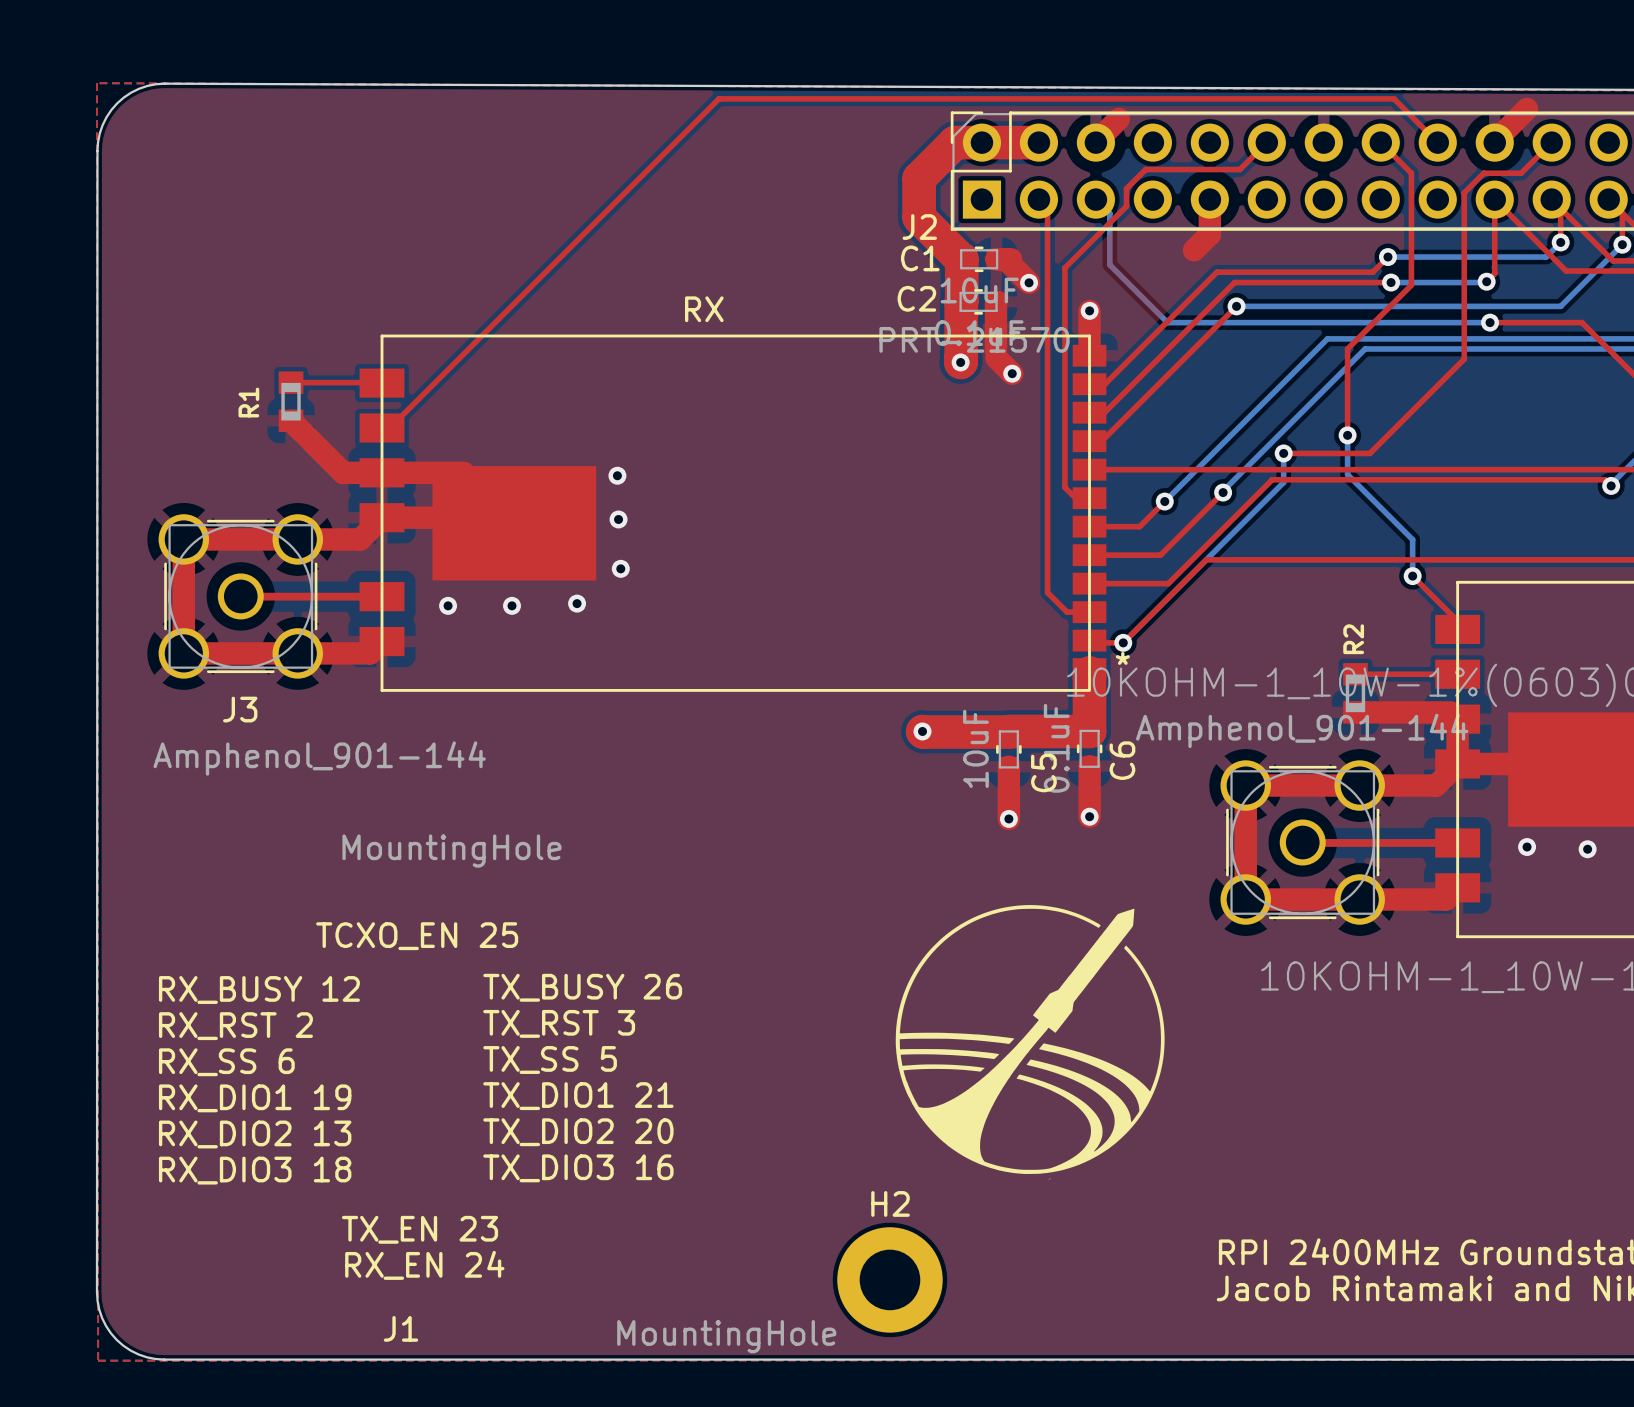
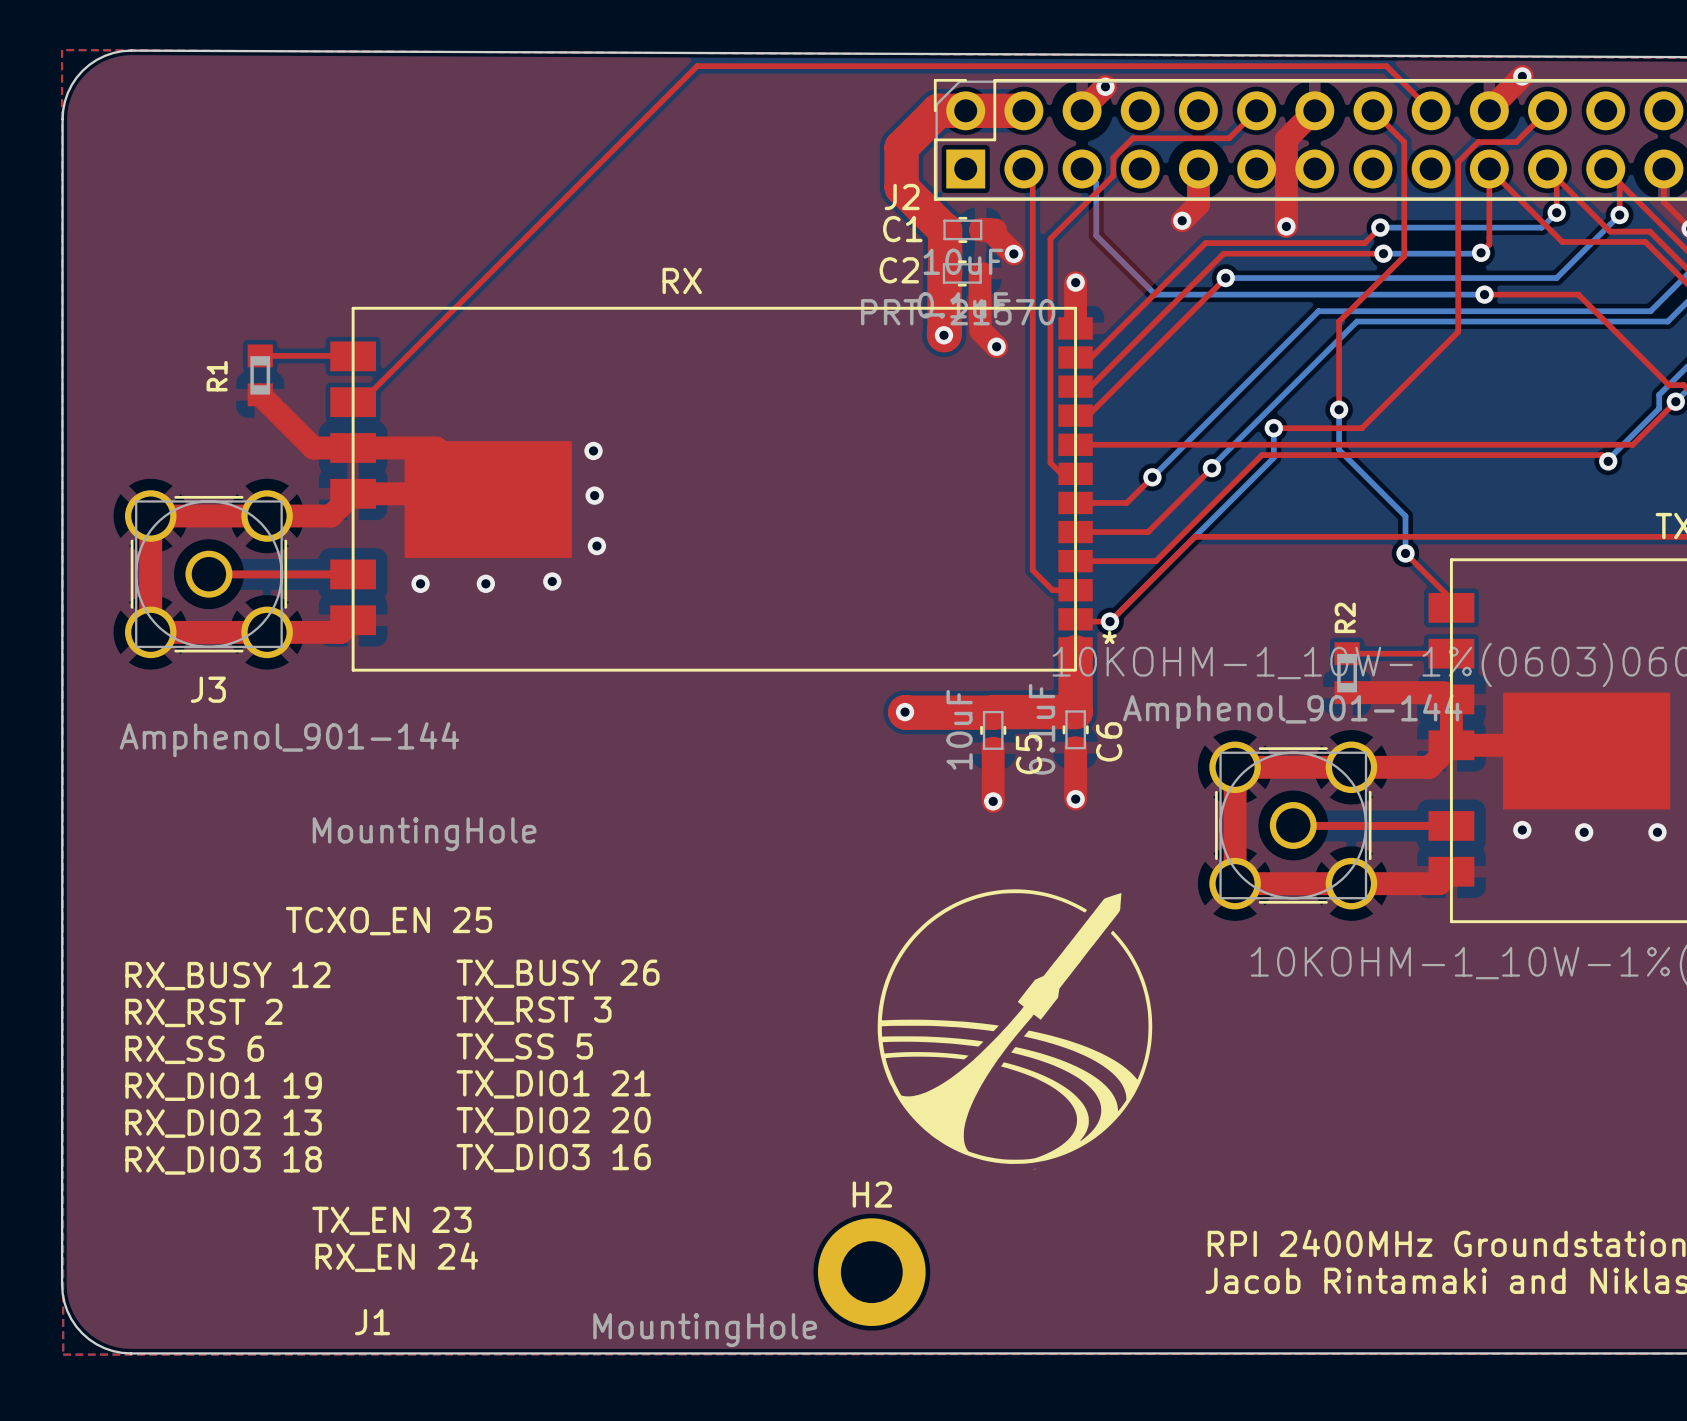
via: none -> (1522, 76)
via: none -> (1105, 86)
top track: none -> (1314, 110) (1286, 139) (1286, 226)
via: none -> (1182, 220)
via: none -> (1286, 226)

